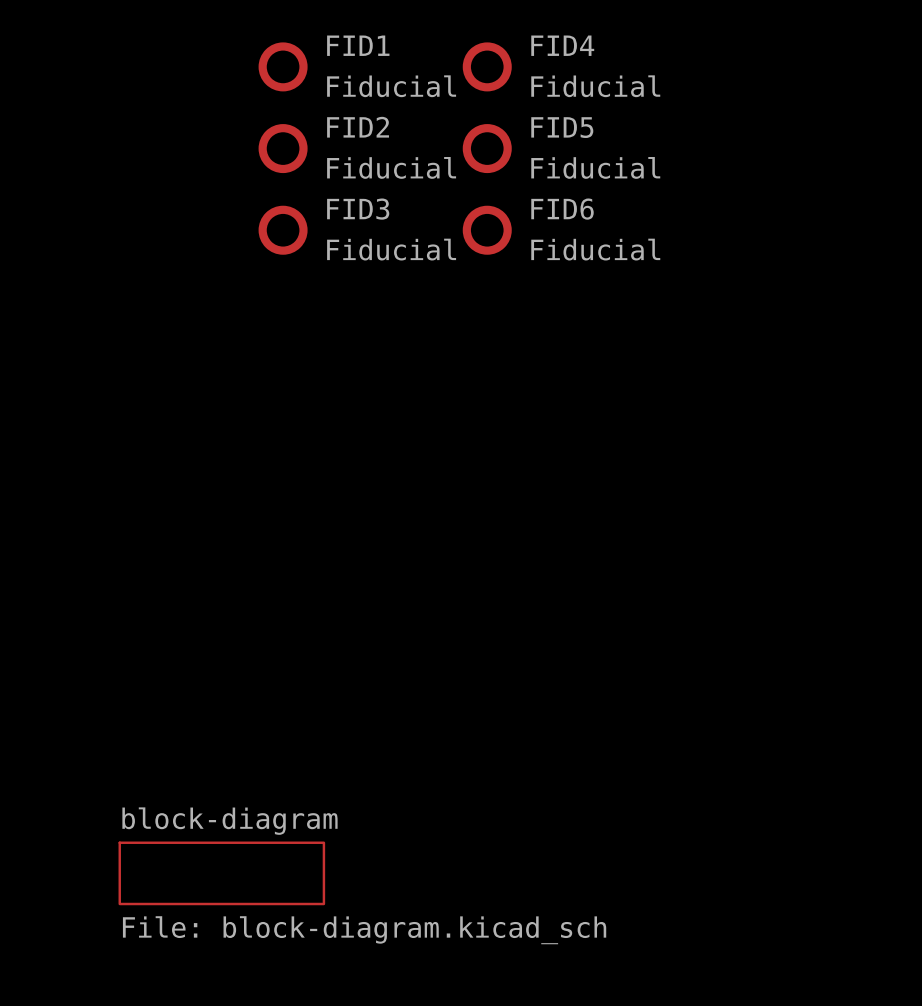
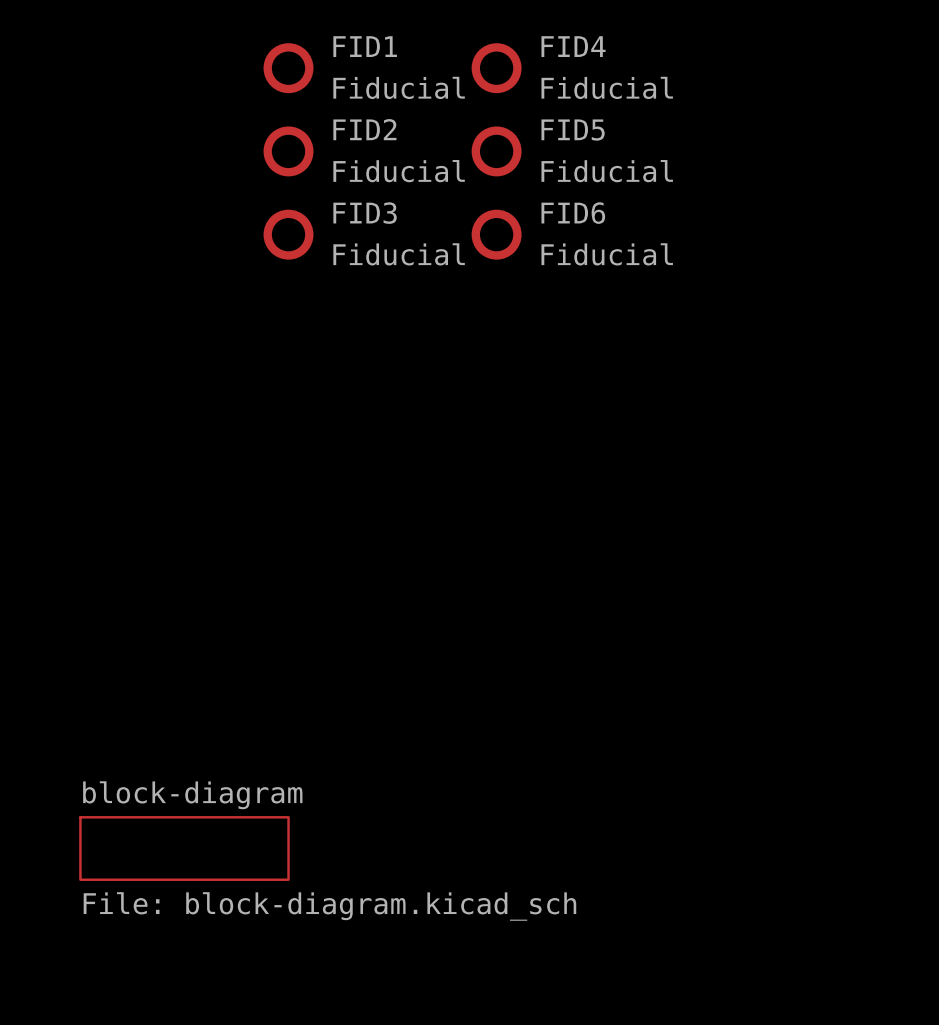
sheet block-diagram position: (221, 873) -> (184, 848)

